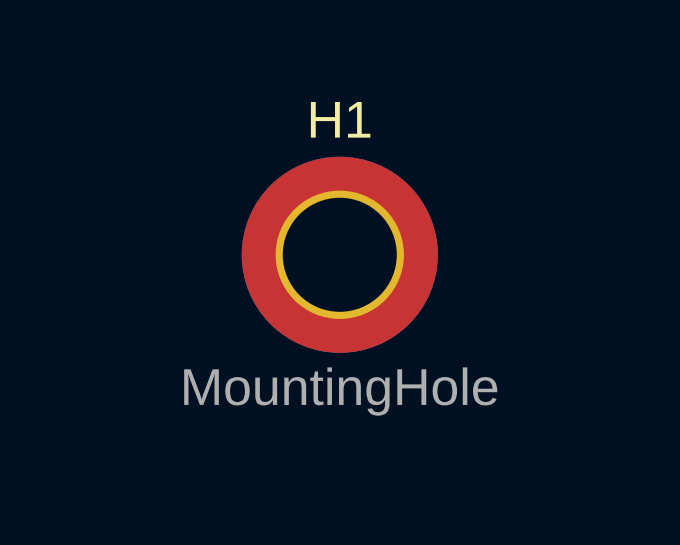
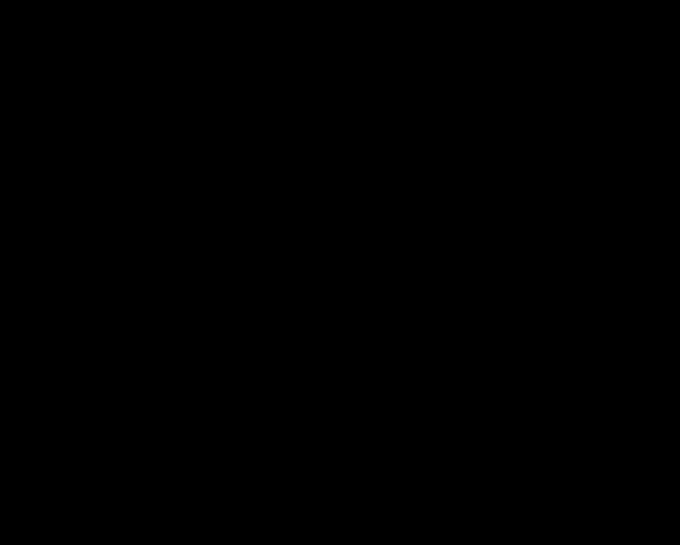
H1: MountingHole (339, 254) -> none

